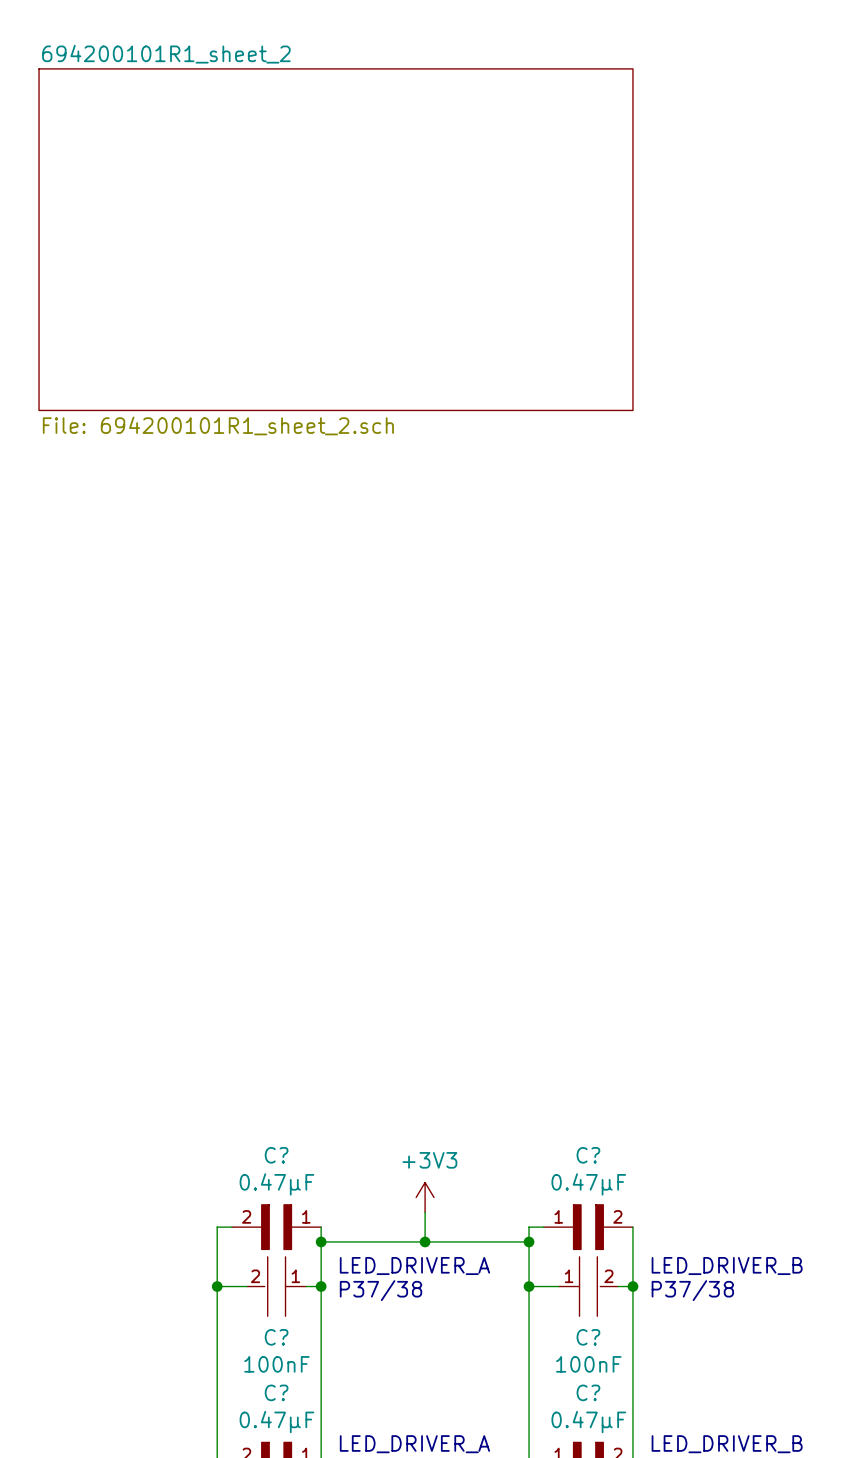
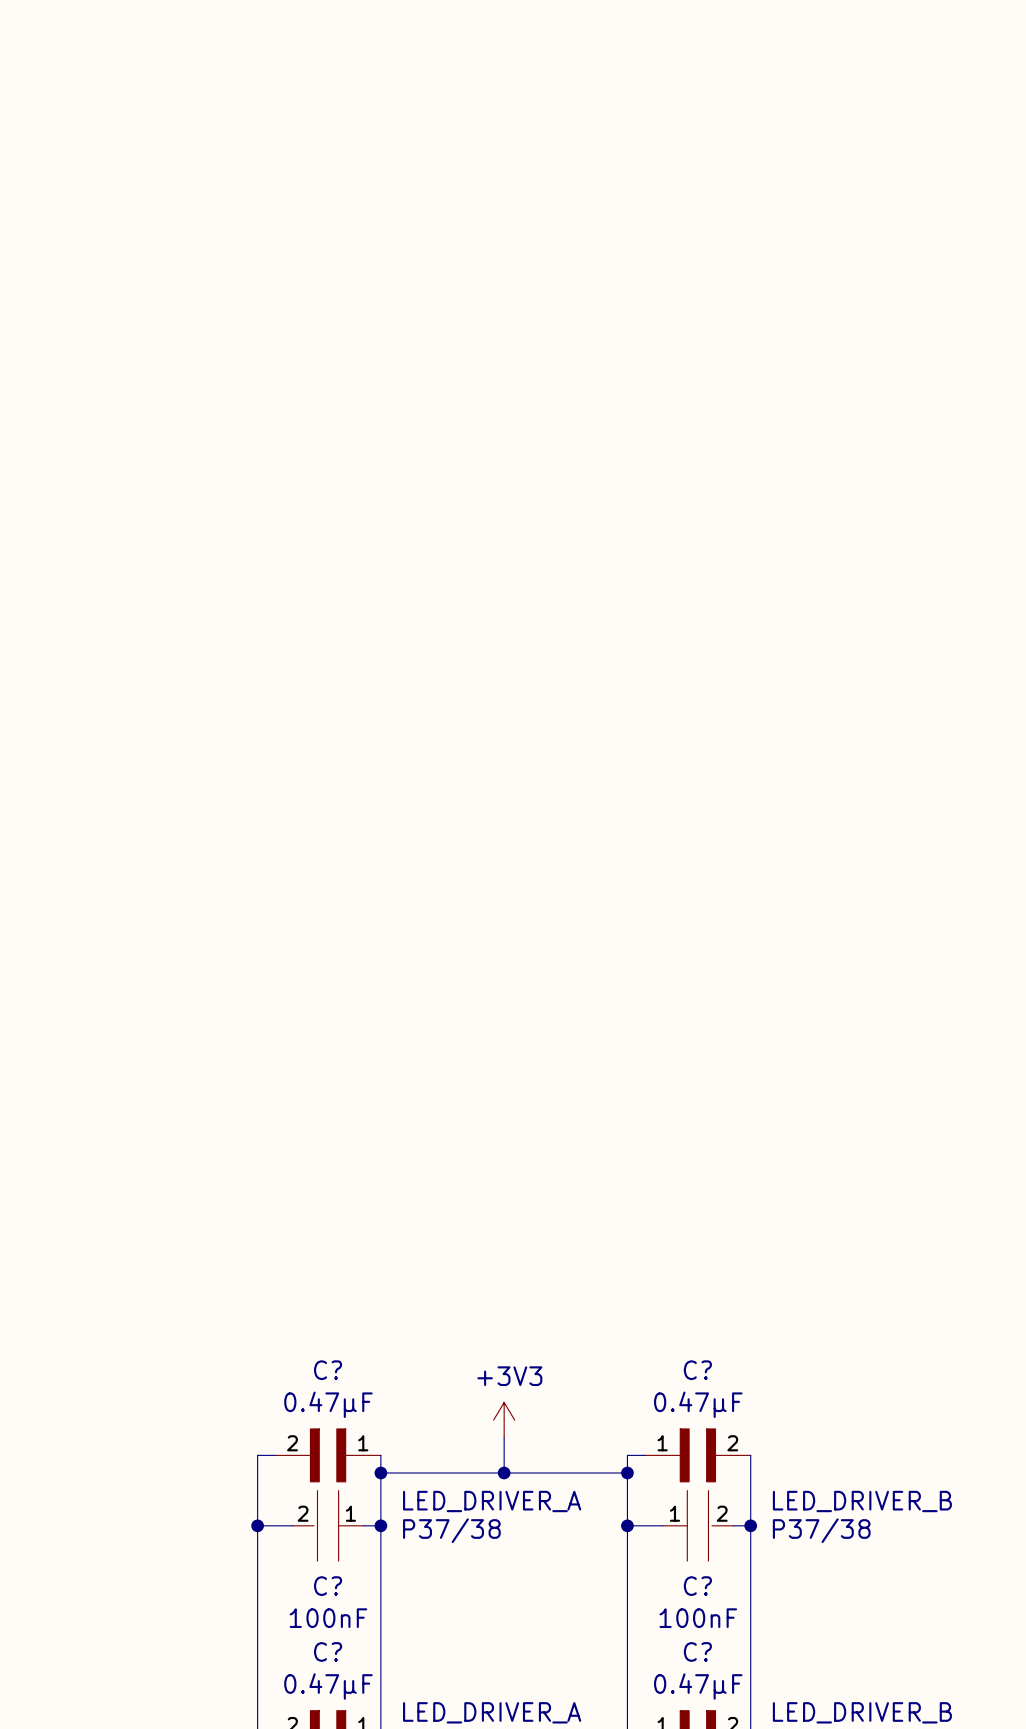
sheet 694200101R1_sheet_2: File: 694200101R1_sheet_2.sch (336, 239) -> none

